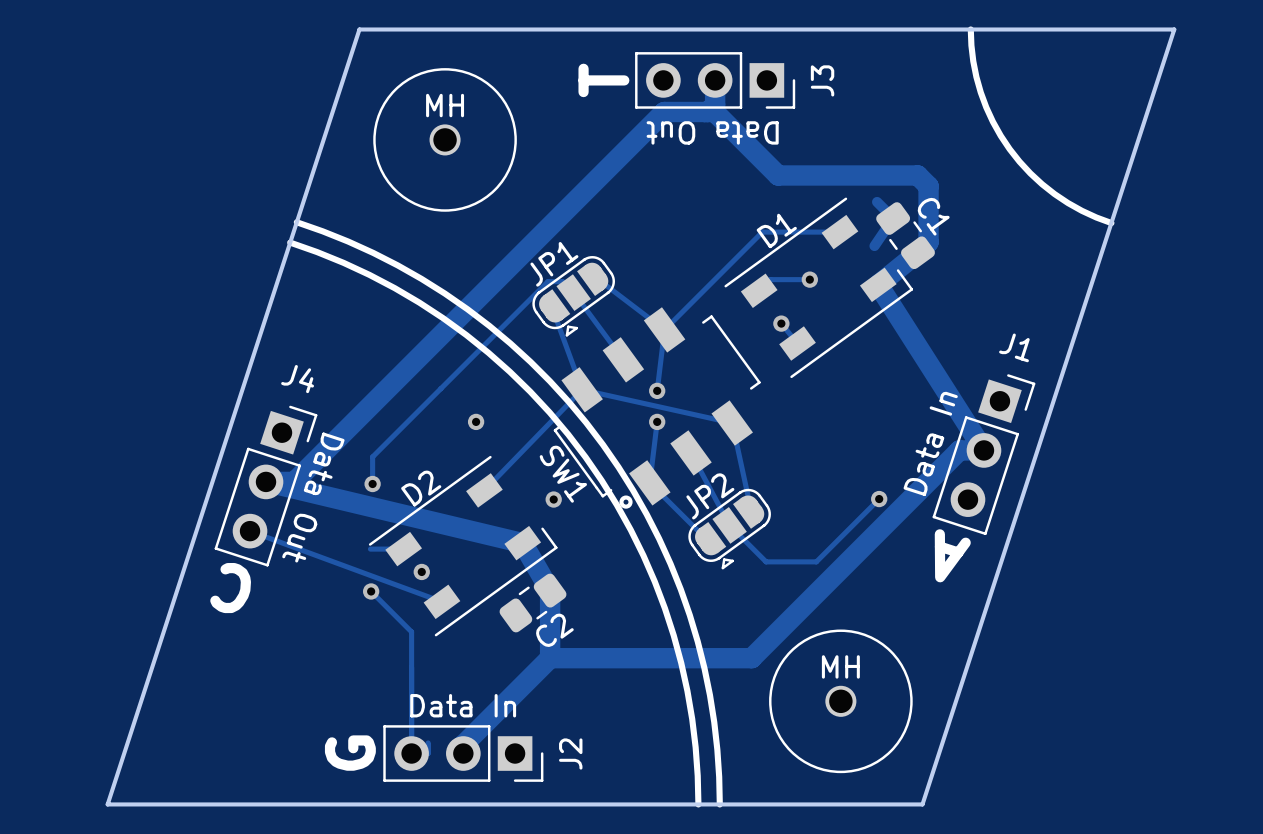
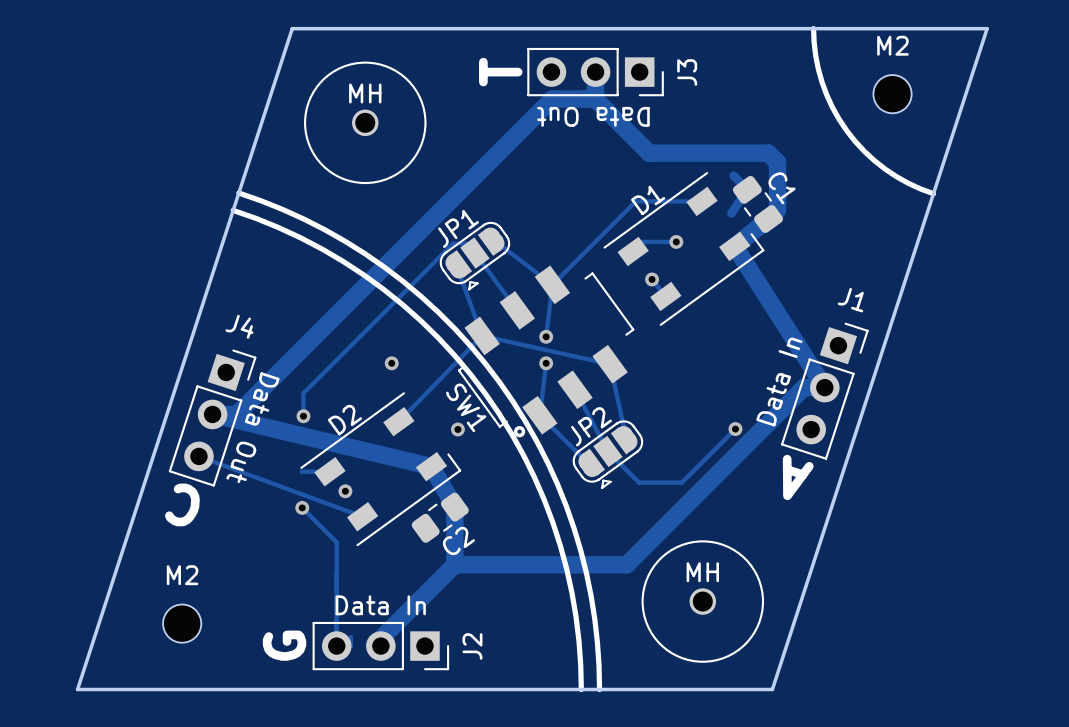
M2: none -> (892, 94)
M2: none -> (182, 623)

